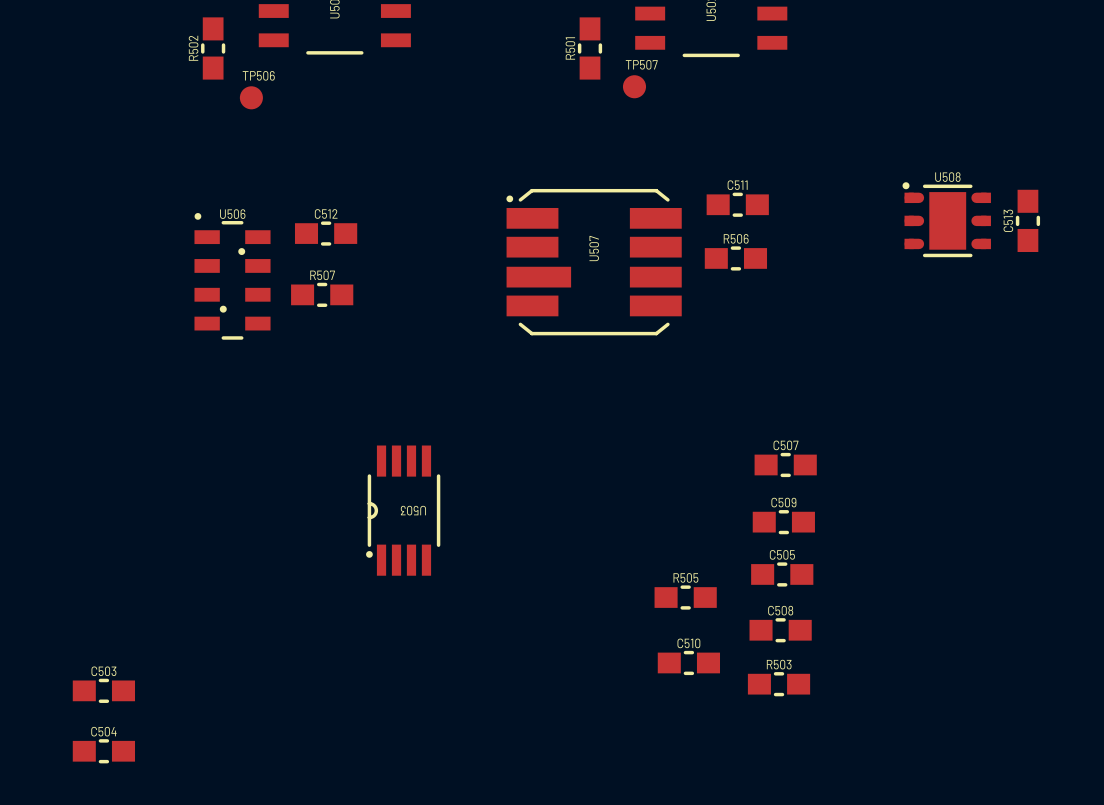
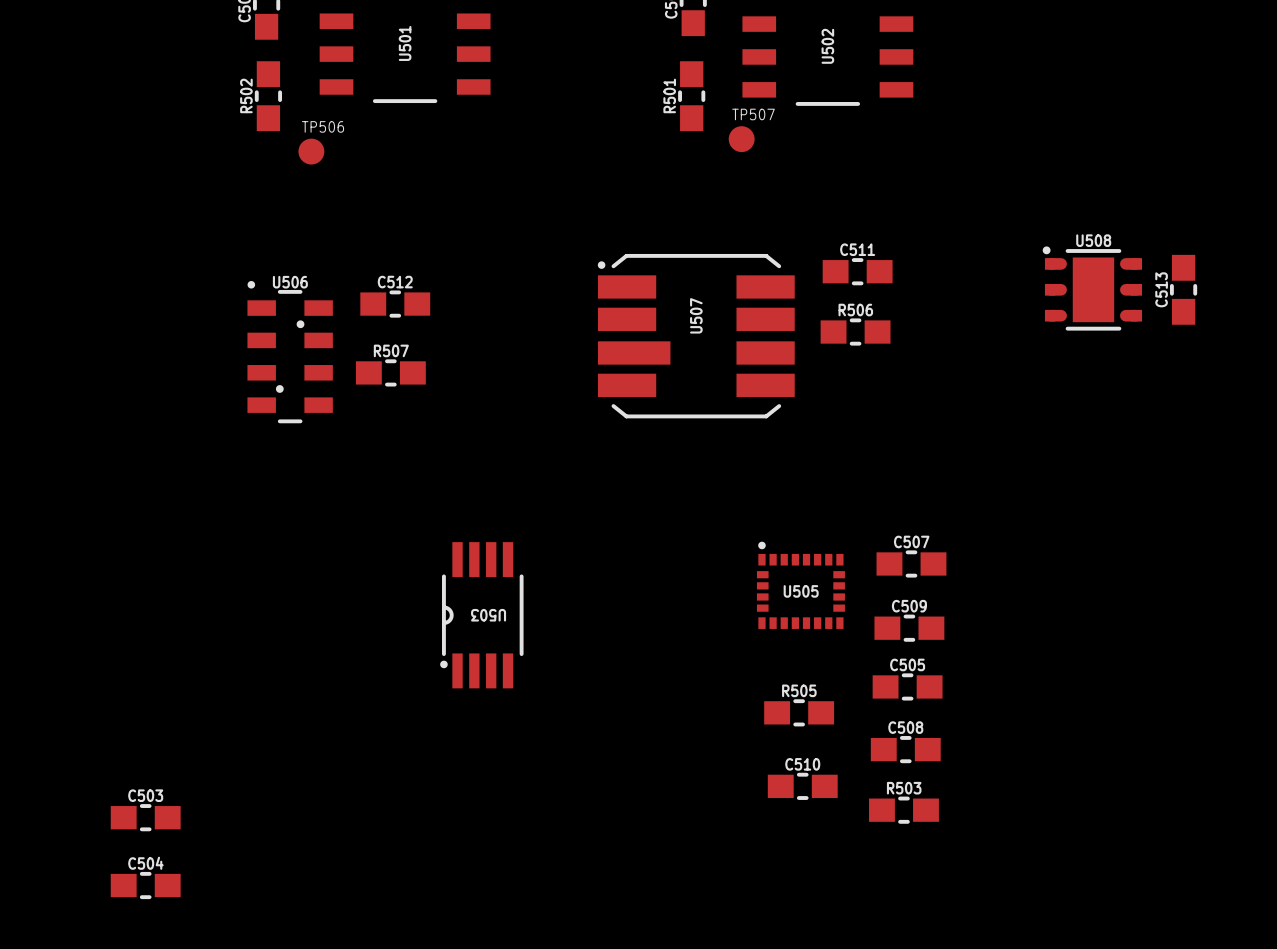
U505: none -> (800, 585)

